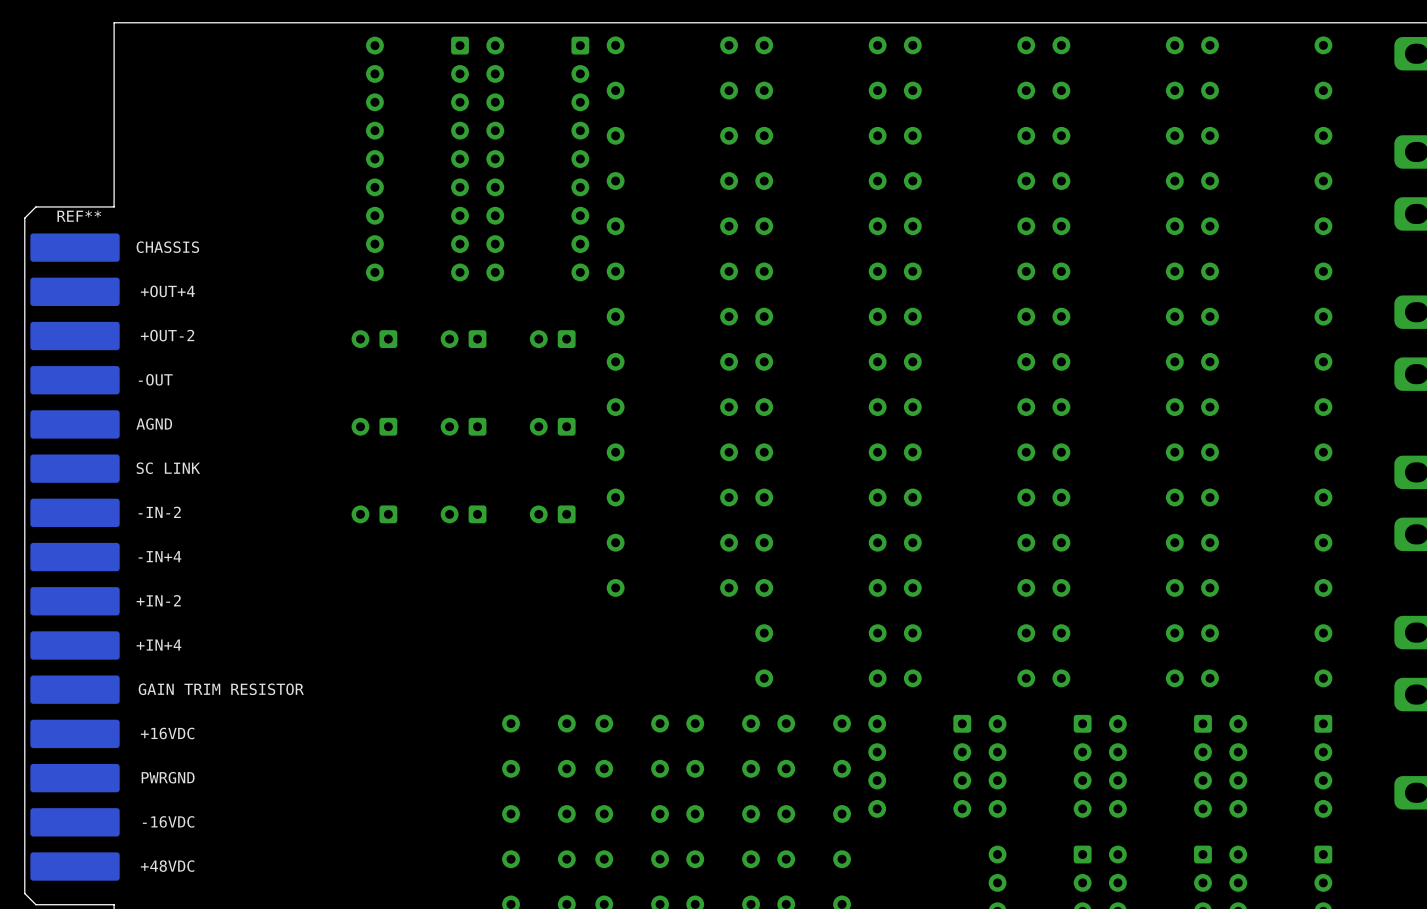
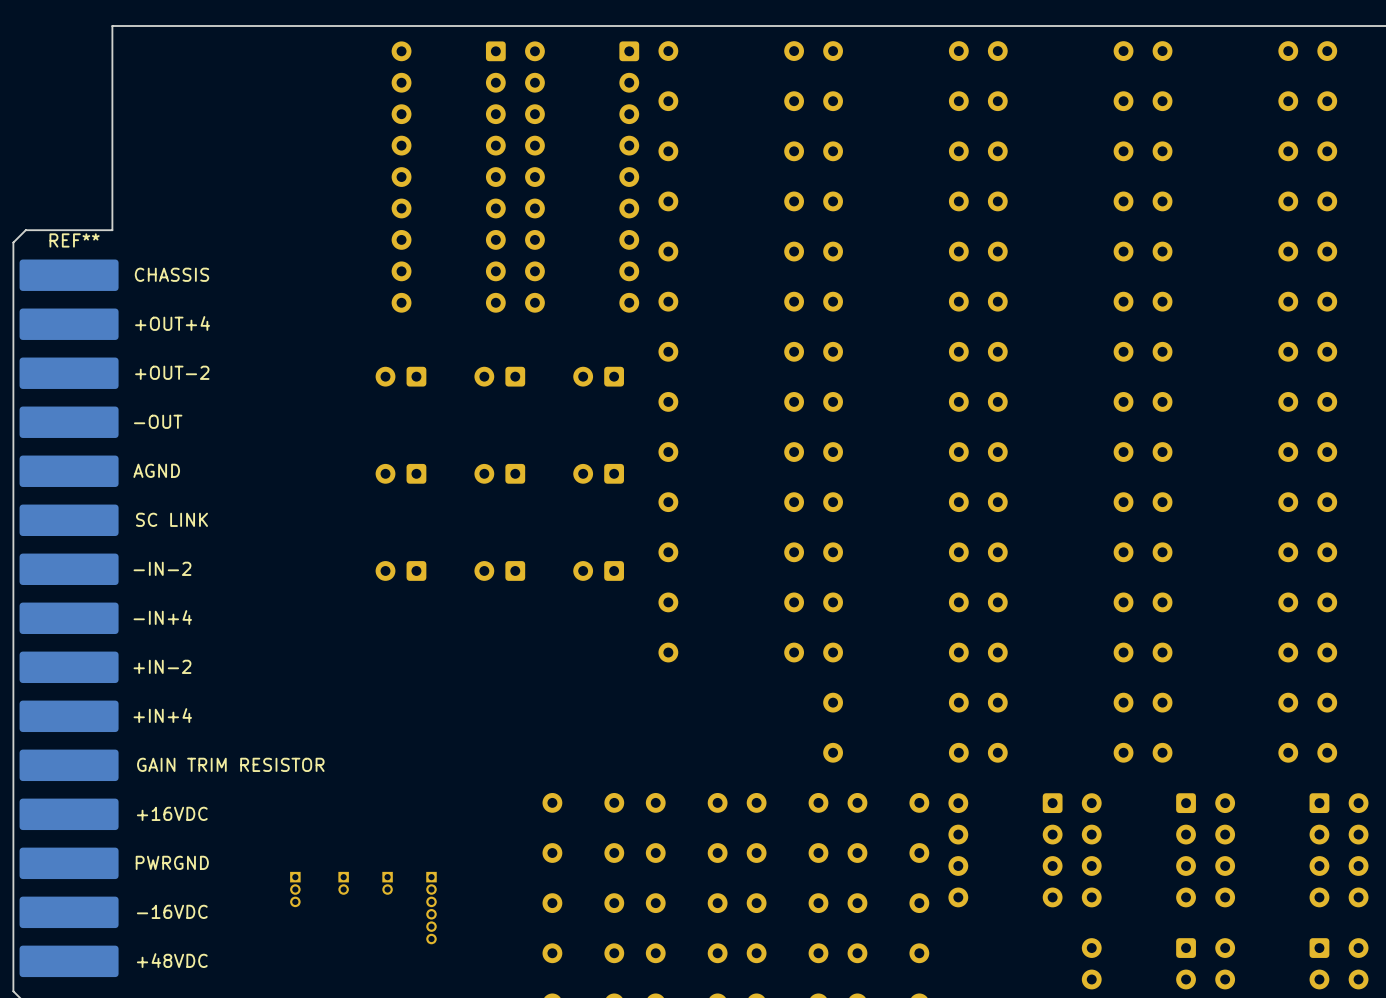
part: none -> (343, 883)
part: none -> (387, 883)
part: none -> (295, 889)
part: none -> (431, 908)

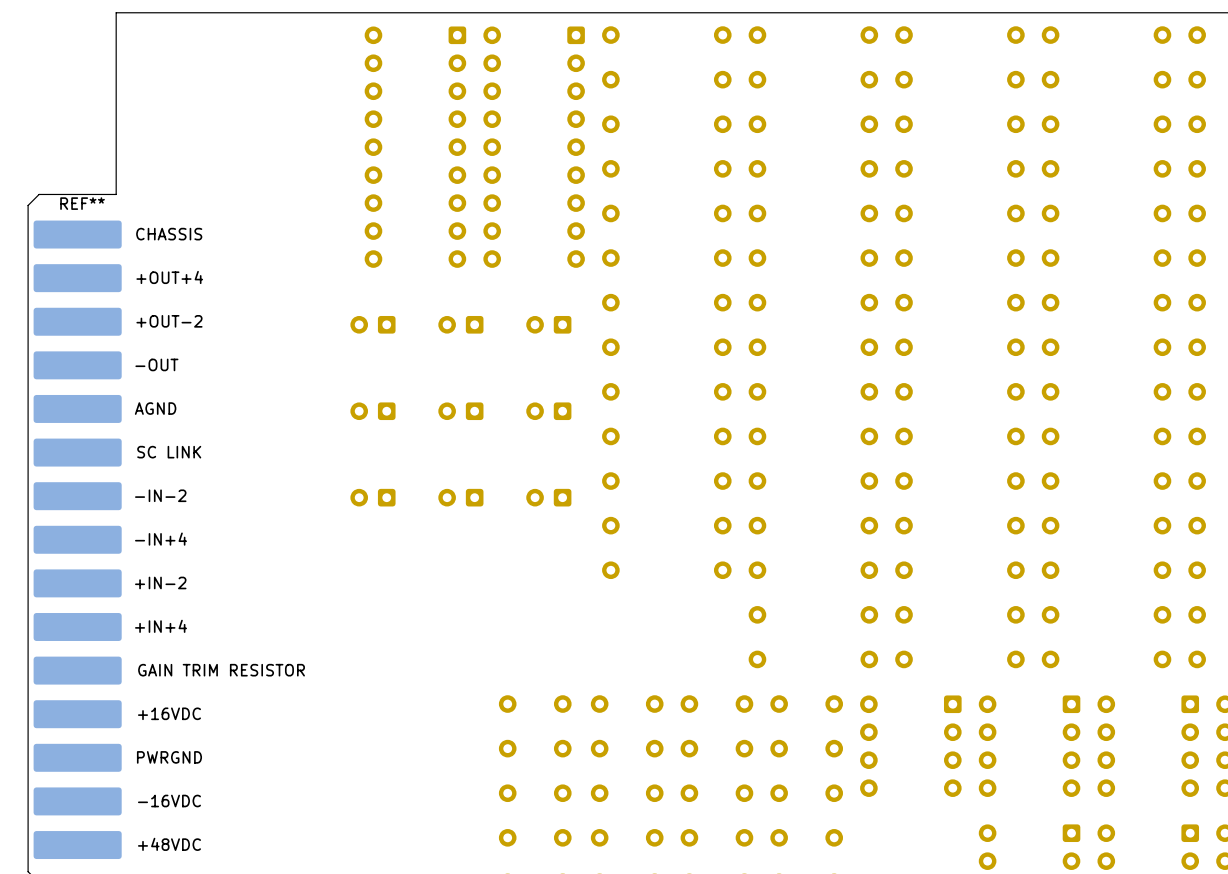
part: (343, 883) -> none
part: (387, 883) -> none
part: (295, 889) -> none
part: (431, 908) -> none

